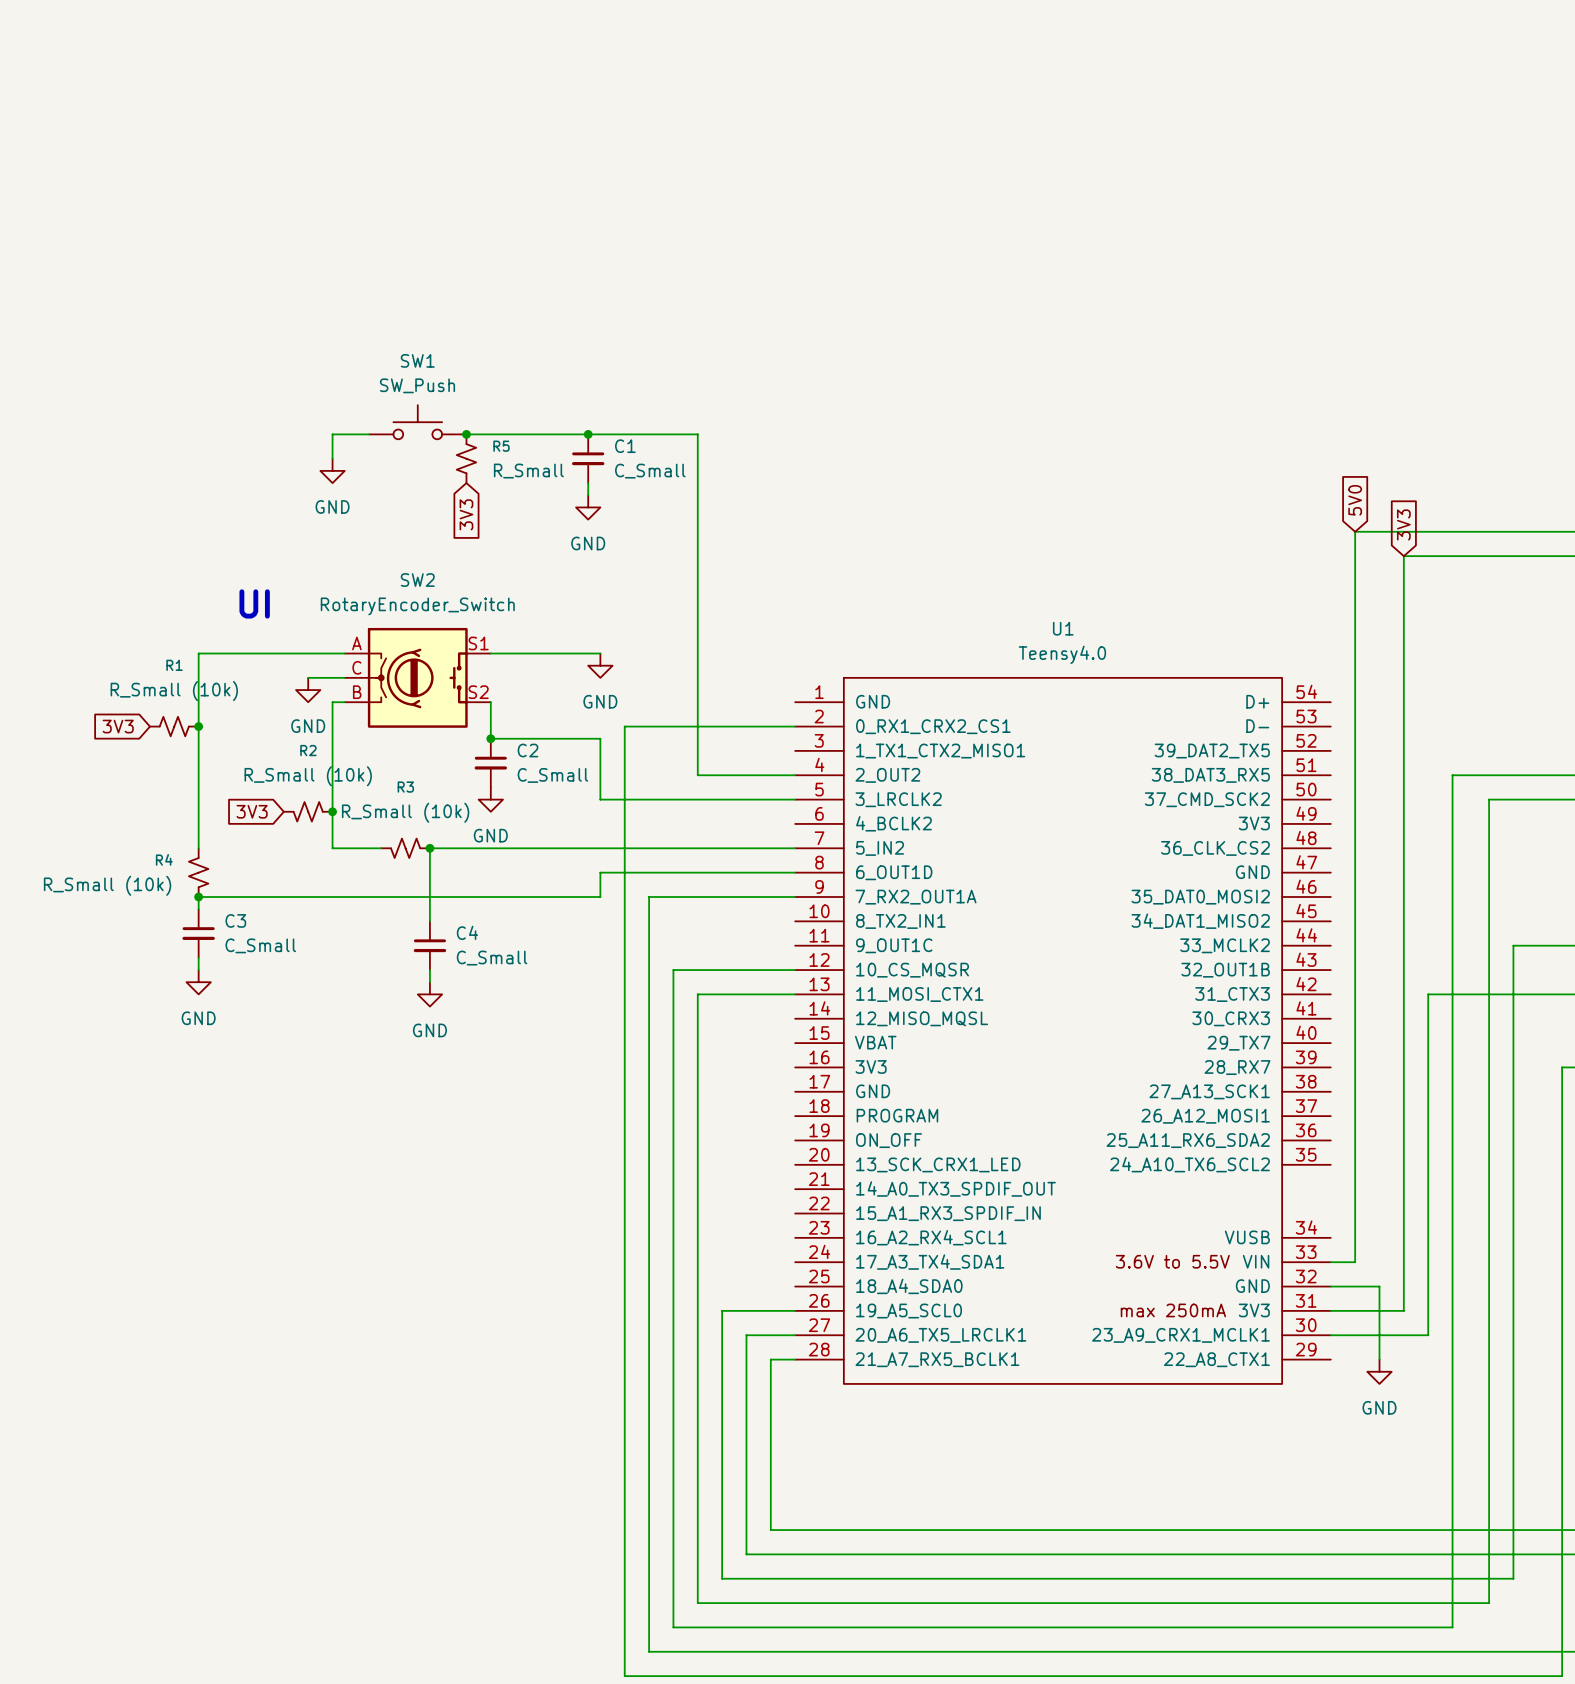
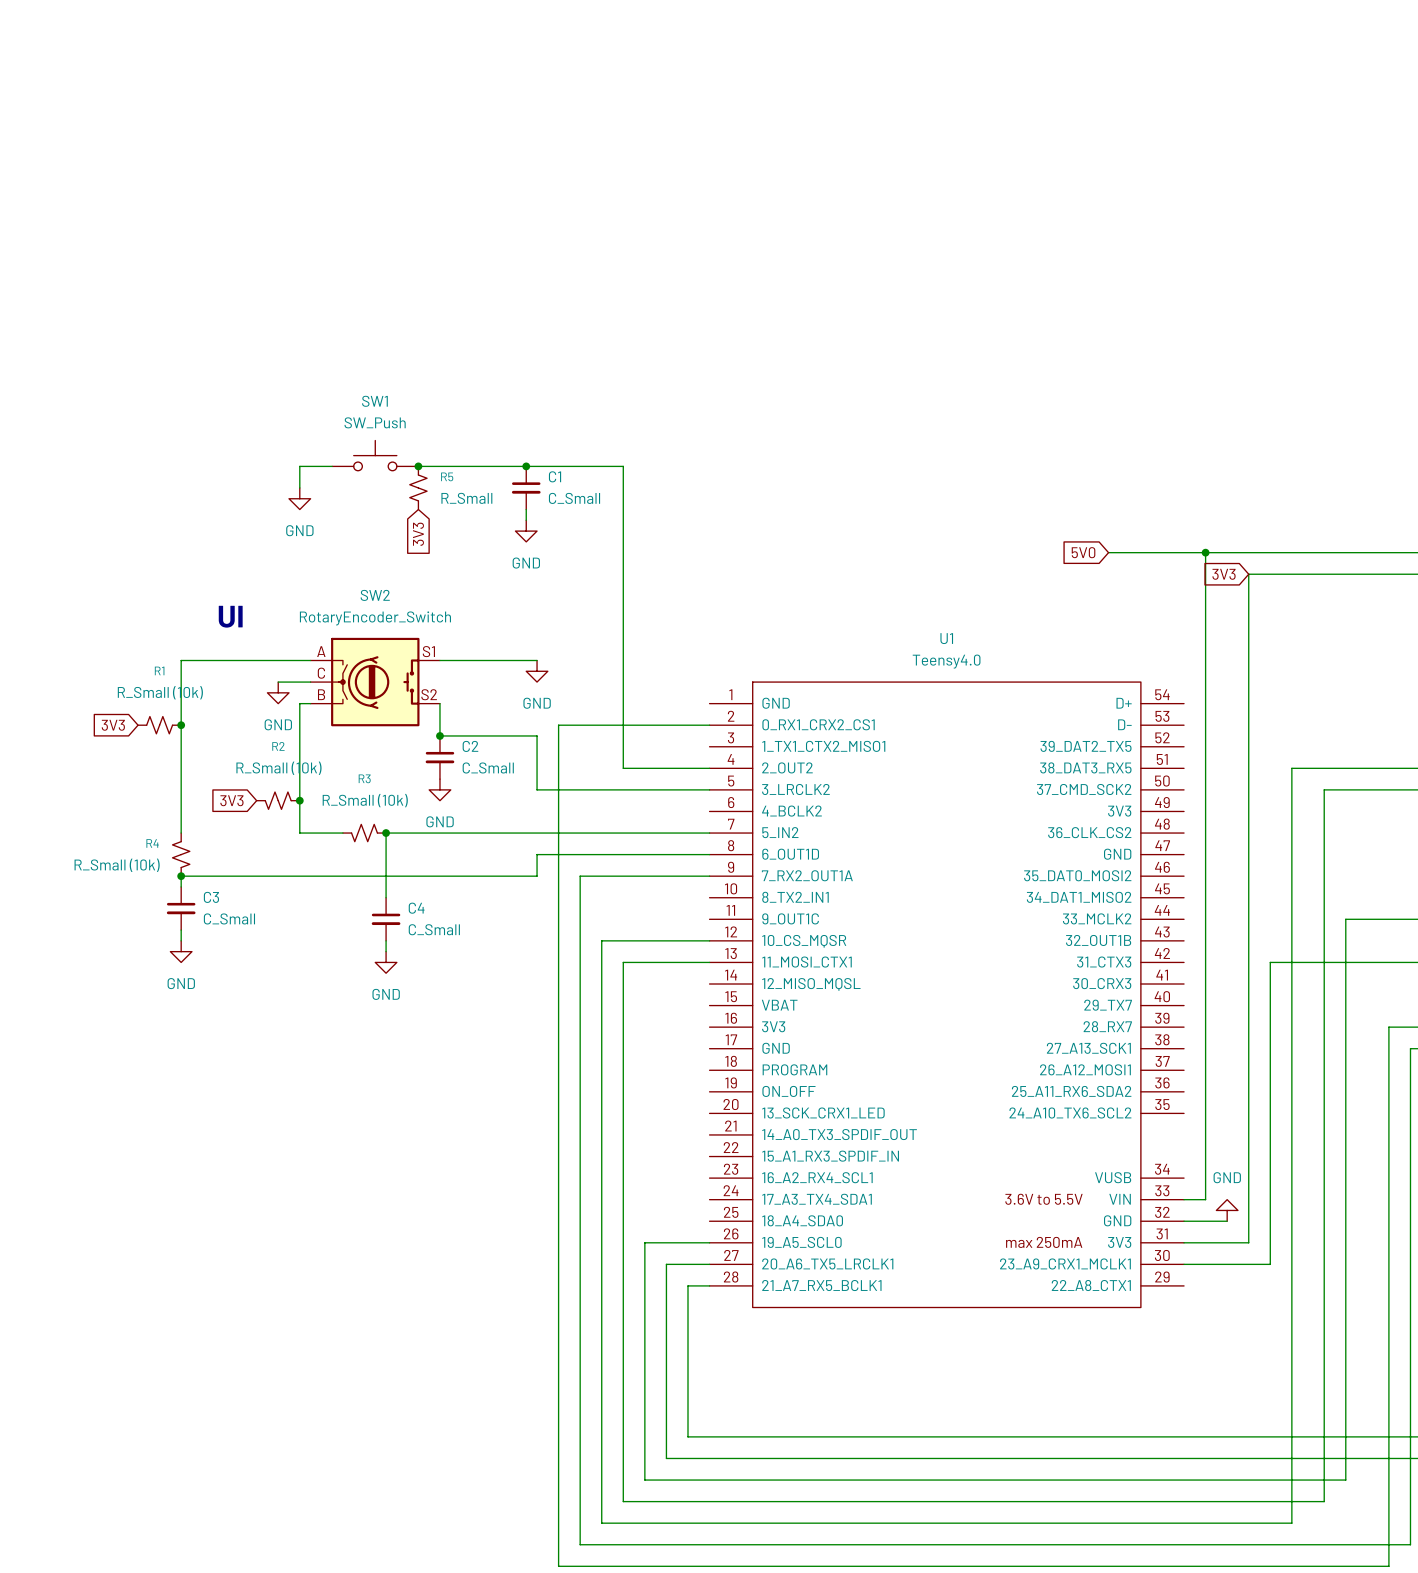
global label rotation: 0° (1355, 500) -> 90° counterclockwise (1083, 552)
global label position: 5V0 (1355, 500) -> 5V0 (1083, 552)
global label rotation: 0° (1403, 524) -> 90° counterclockwise (1224, 574)
wire: none -> (1108, 552) (1205, 552)
junction: none -> (1205, 552)
wire: (1379, 1286) (1379, 1359) -> none
power symbol rotation: 0° (1379, 1371) -> 180° (1227, 1210)
power symbol position: GND (1379, 1371) -> GND (1227, 1210)

